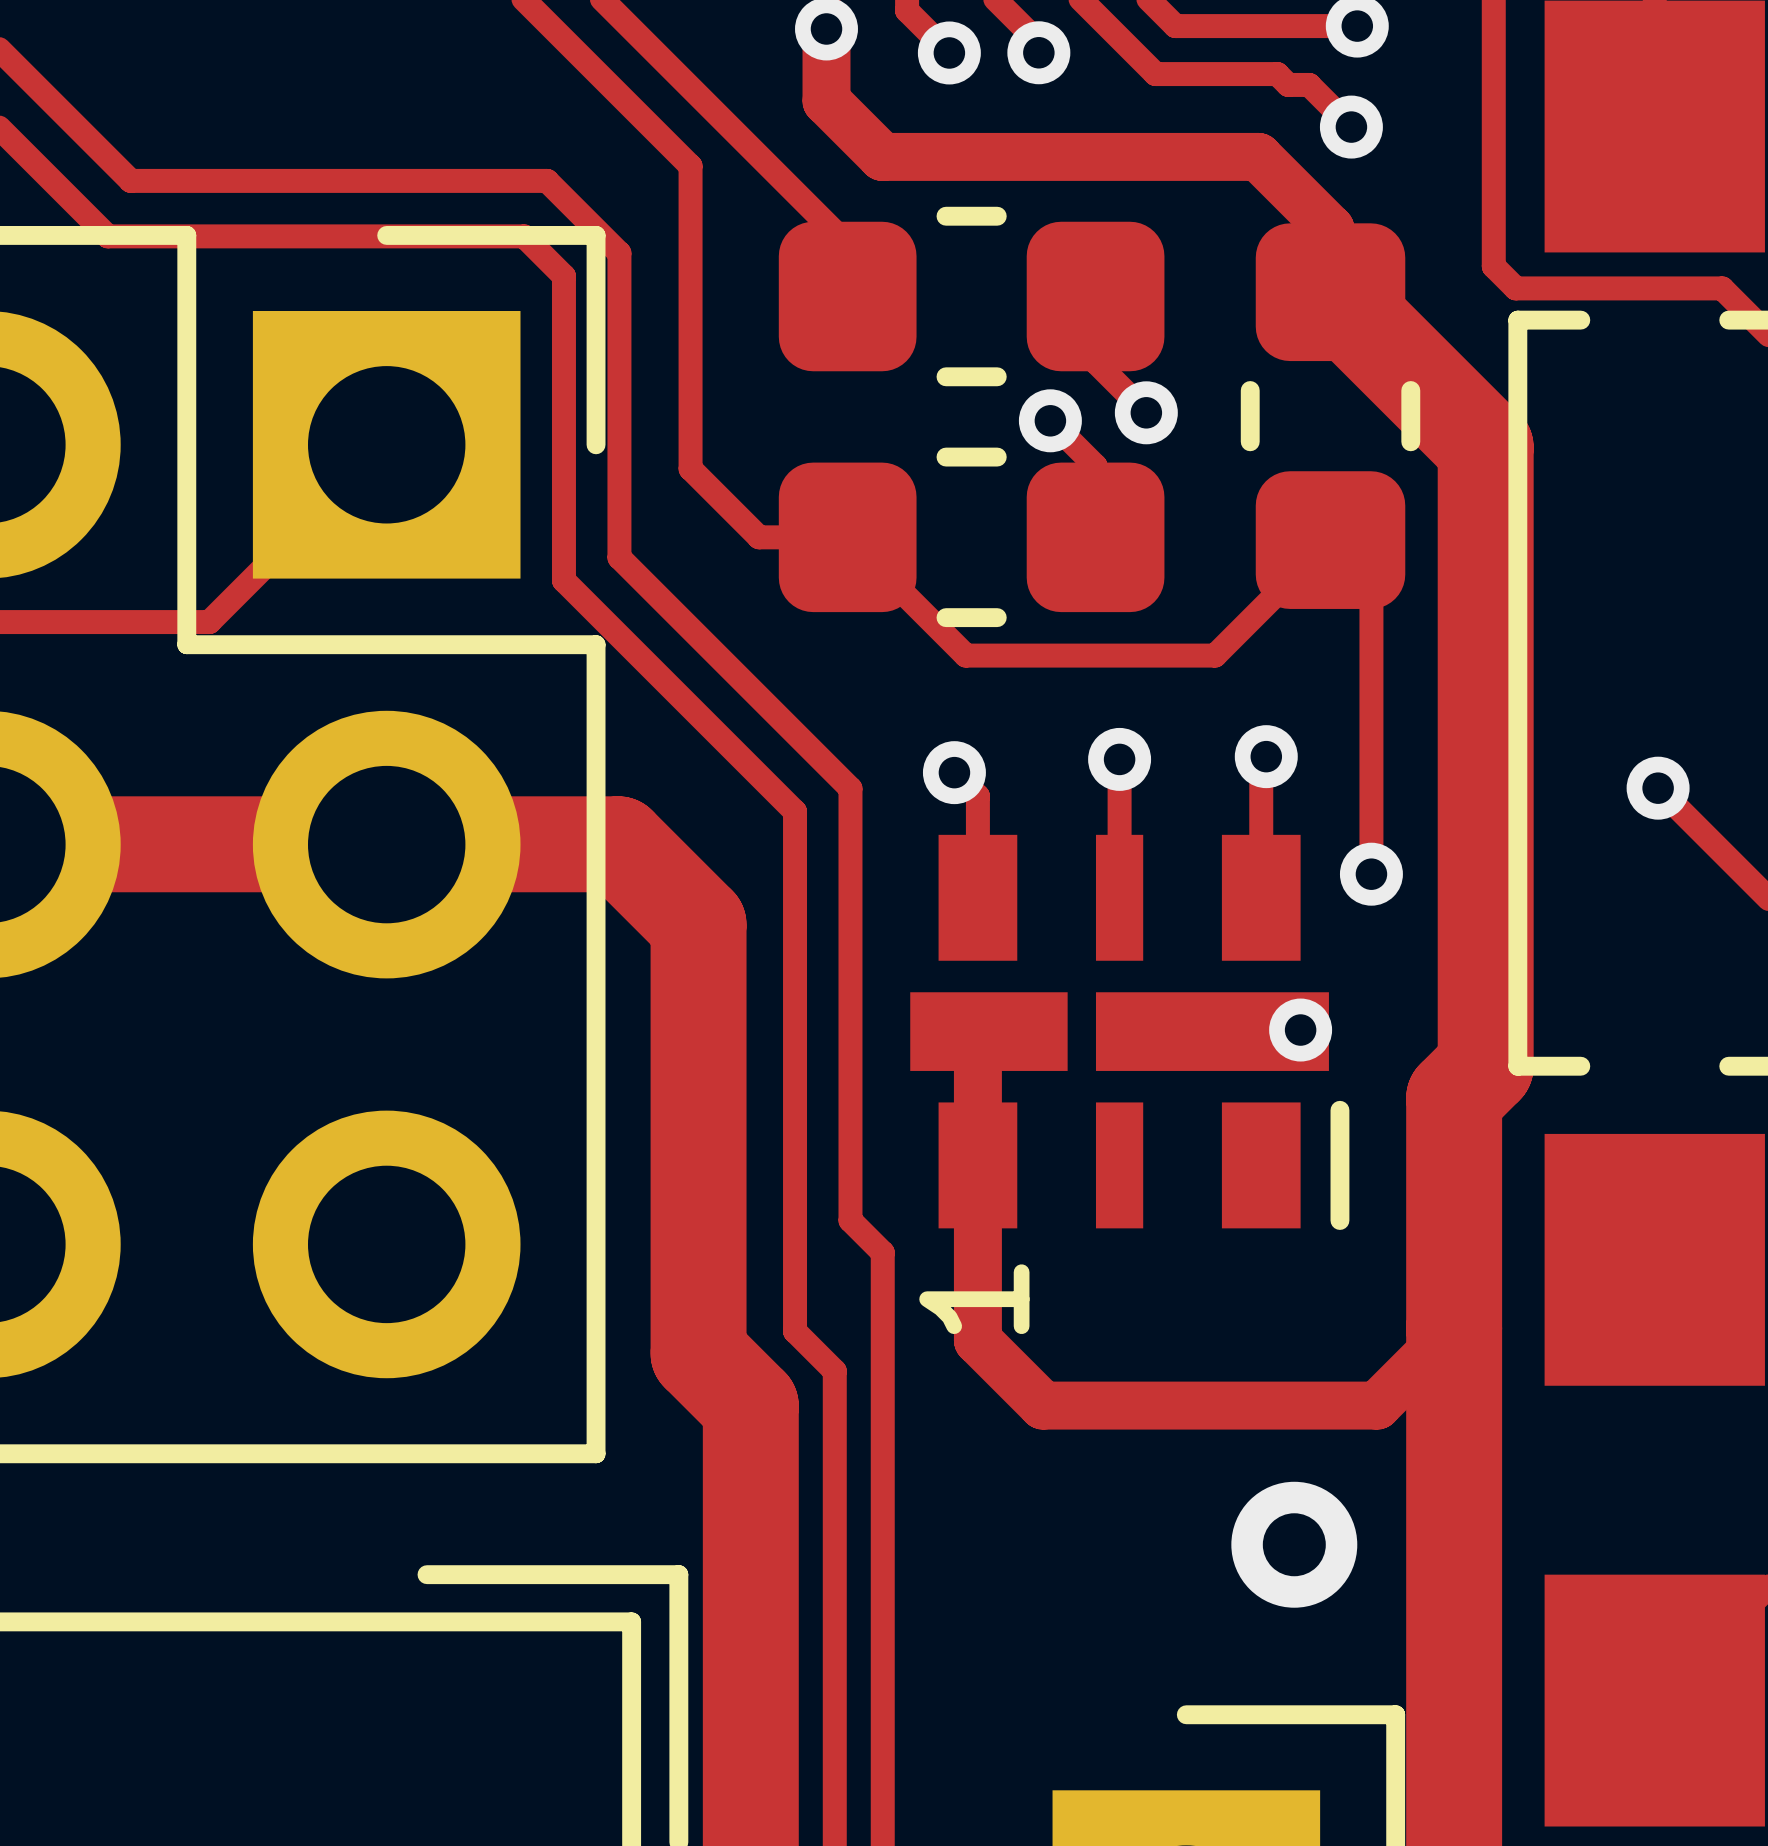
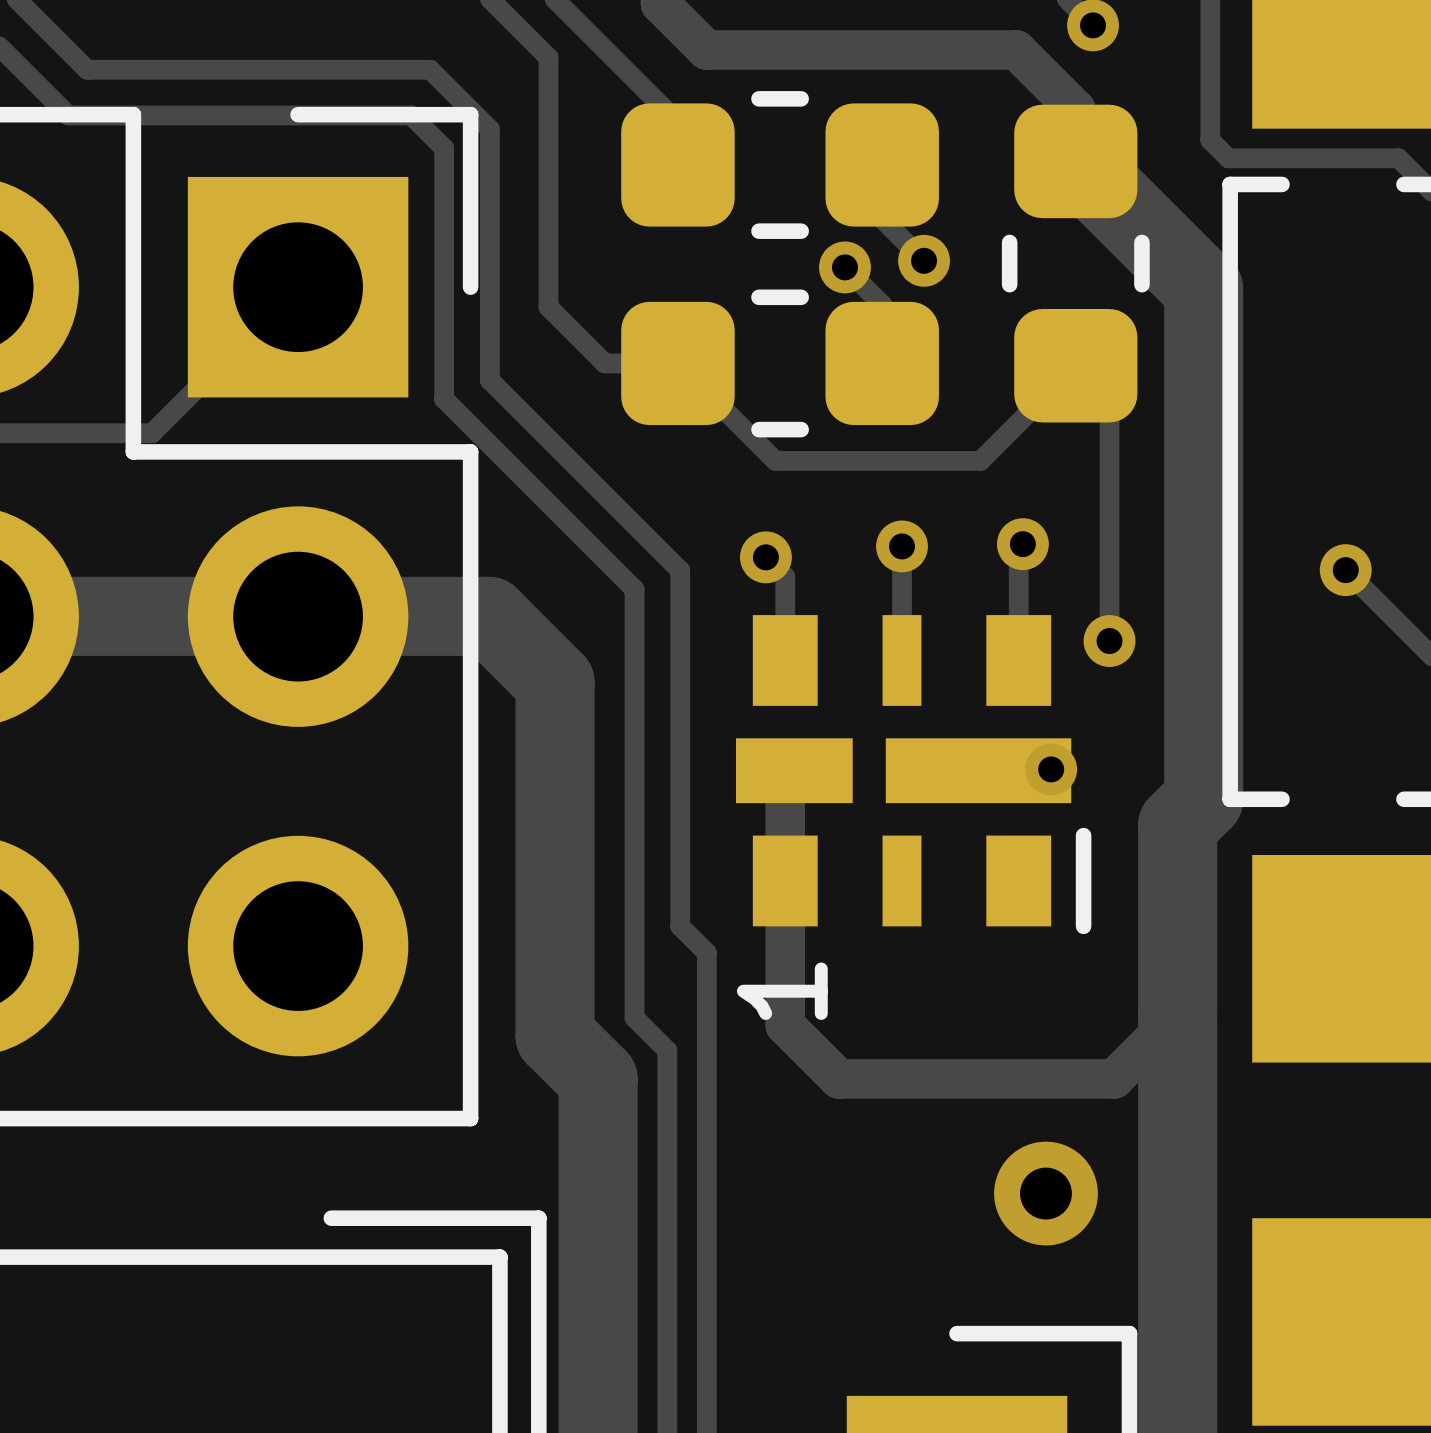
part footprint: [910, 834, 1350, 1230] -> [735, 615, 1092, 935]

